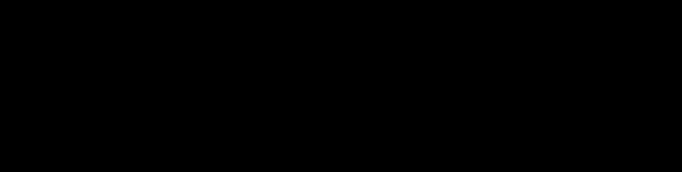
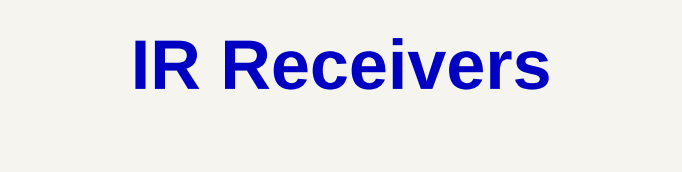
text: none -> IR Receivers (342, 63)

